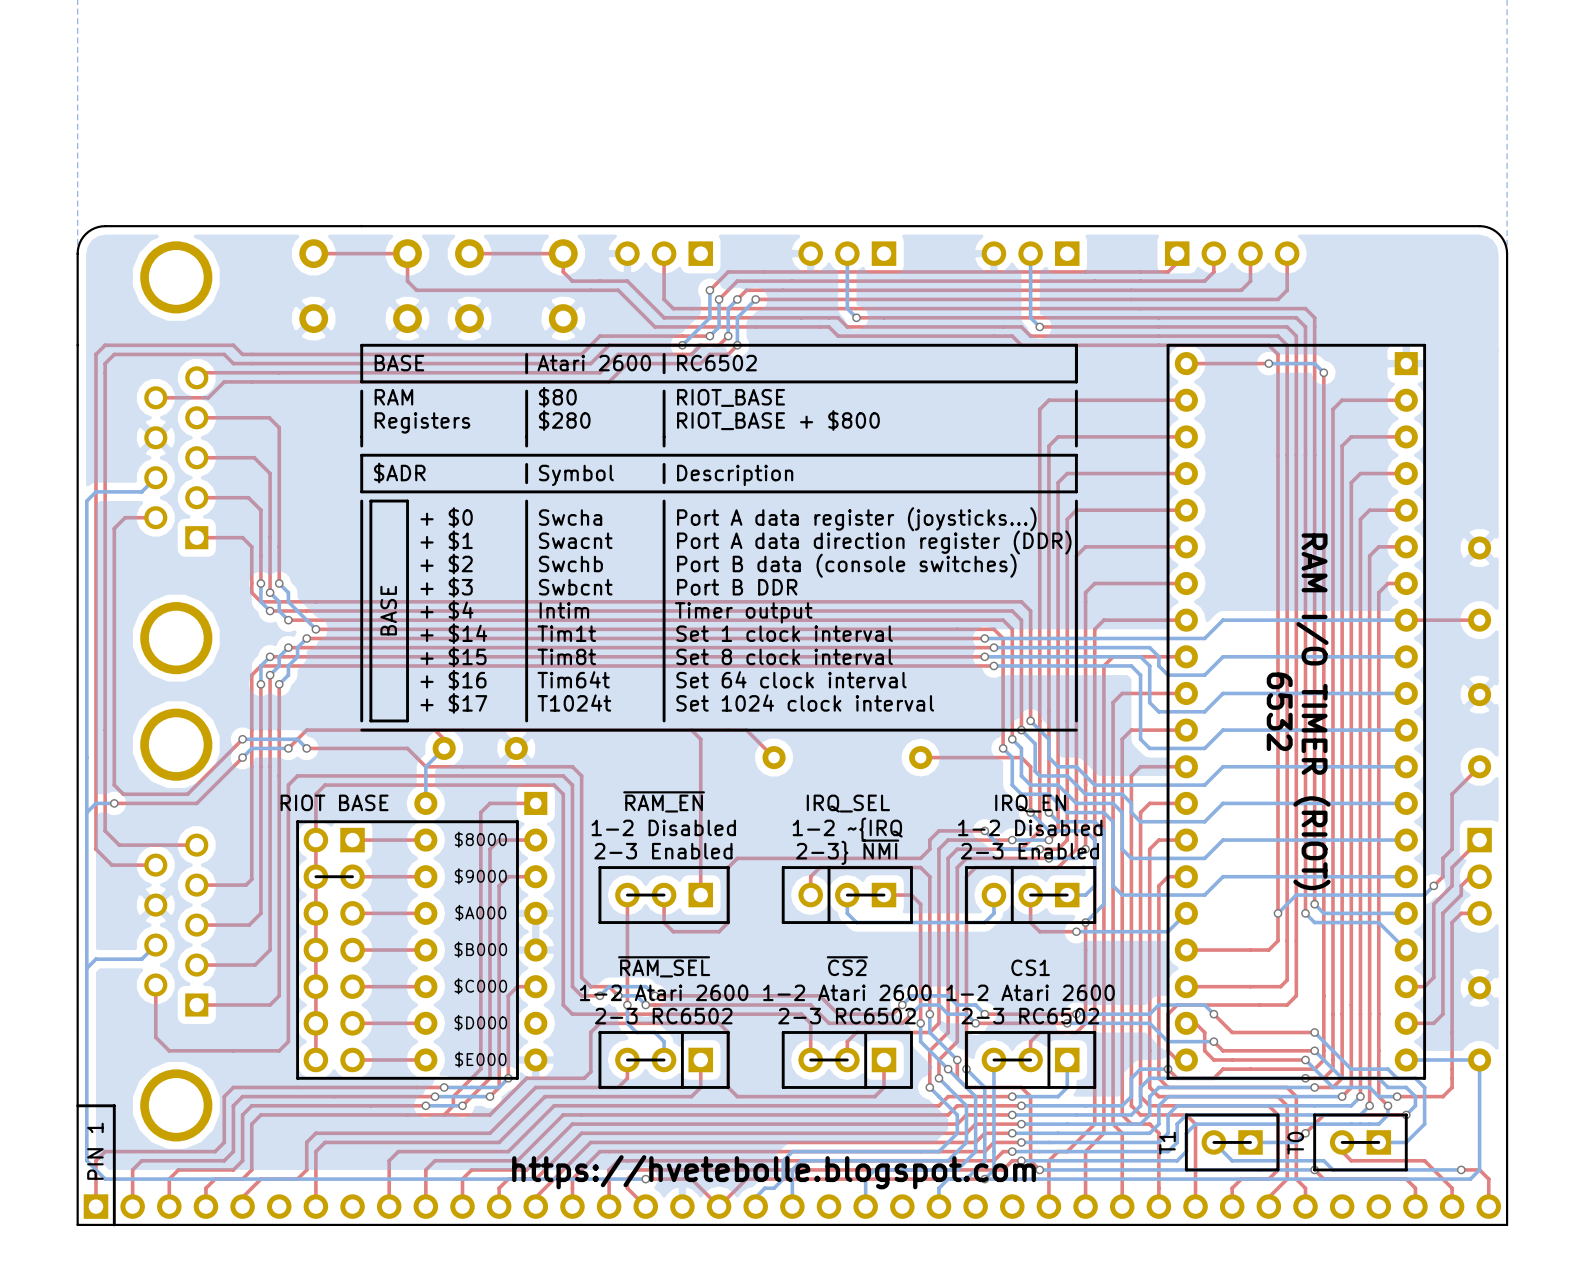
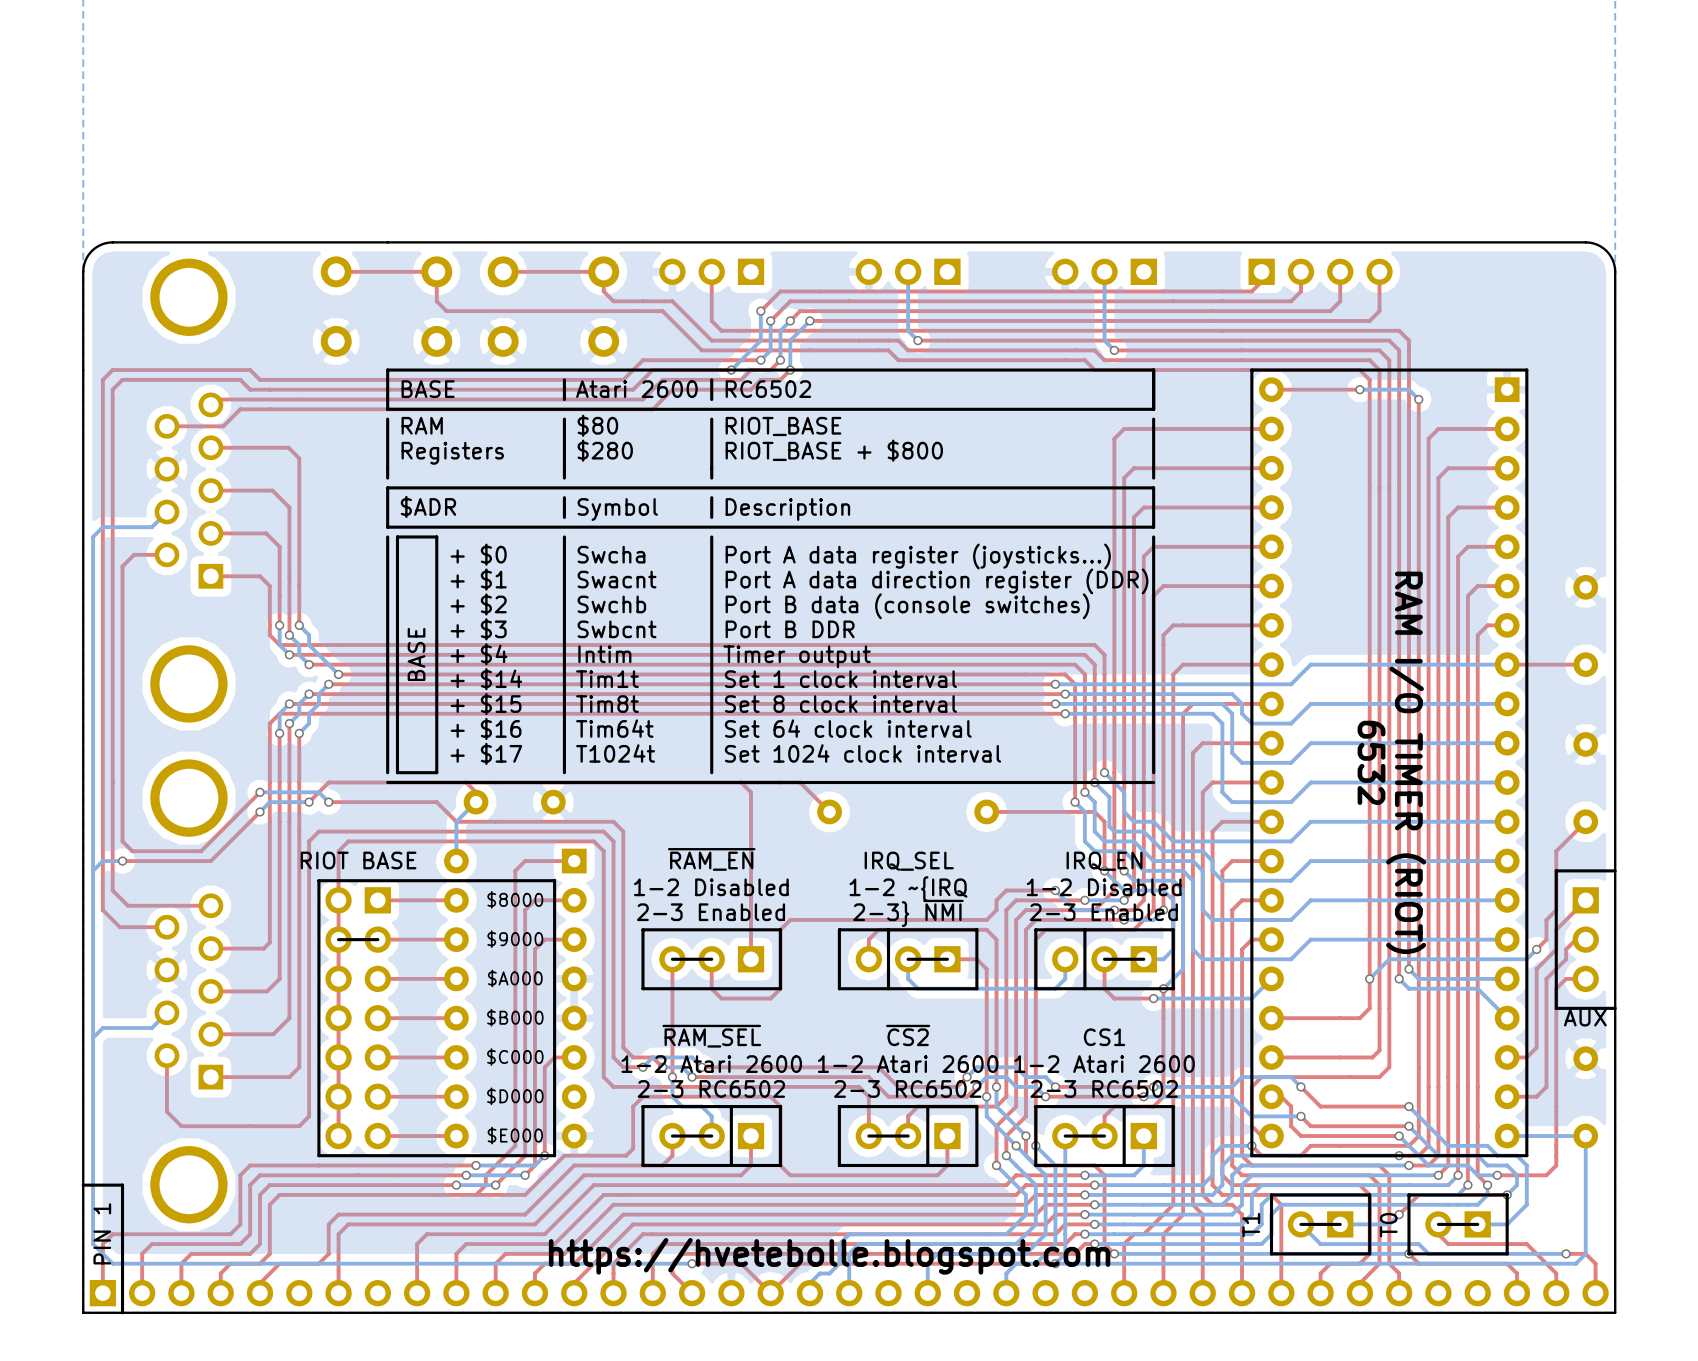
line: none -> (1615, 870) (1556, 870) (1556, 1008) (1615, 1008)
text: none -> AUX (1585, 1017)

